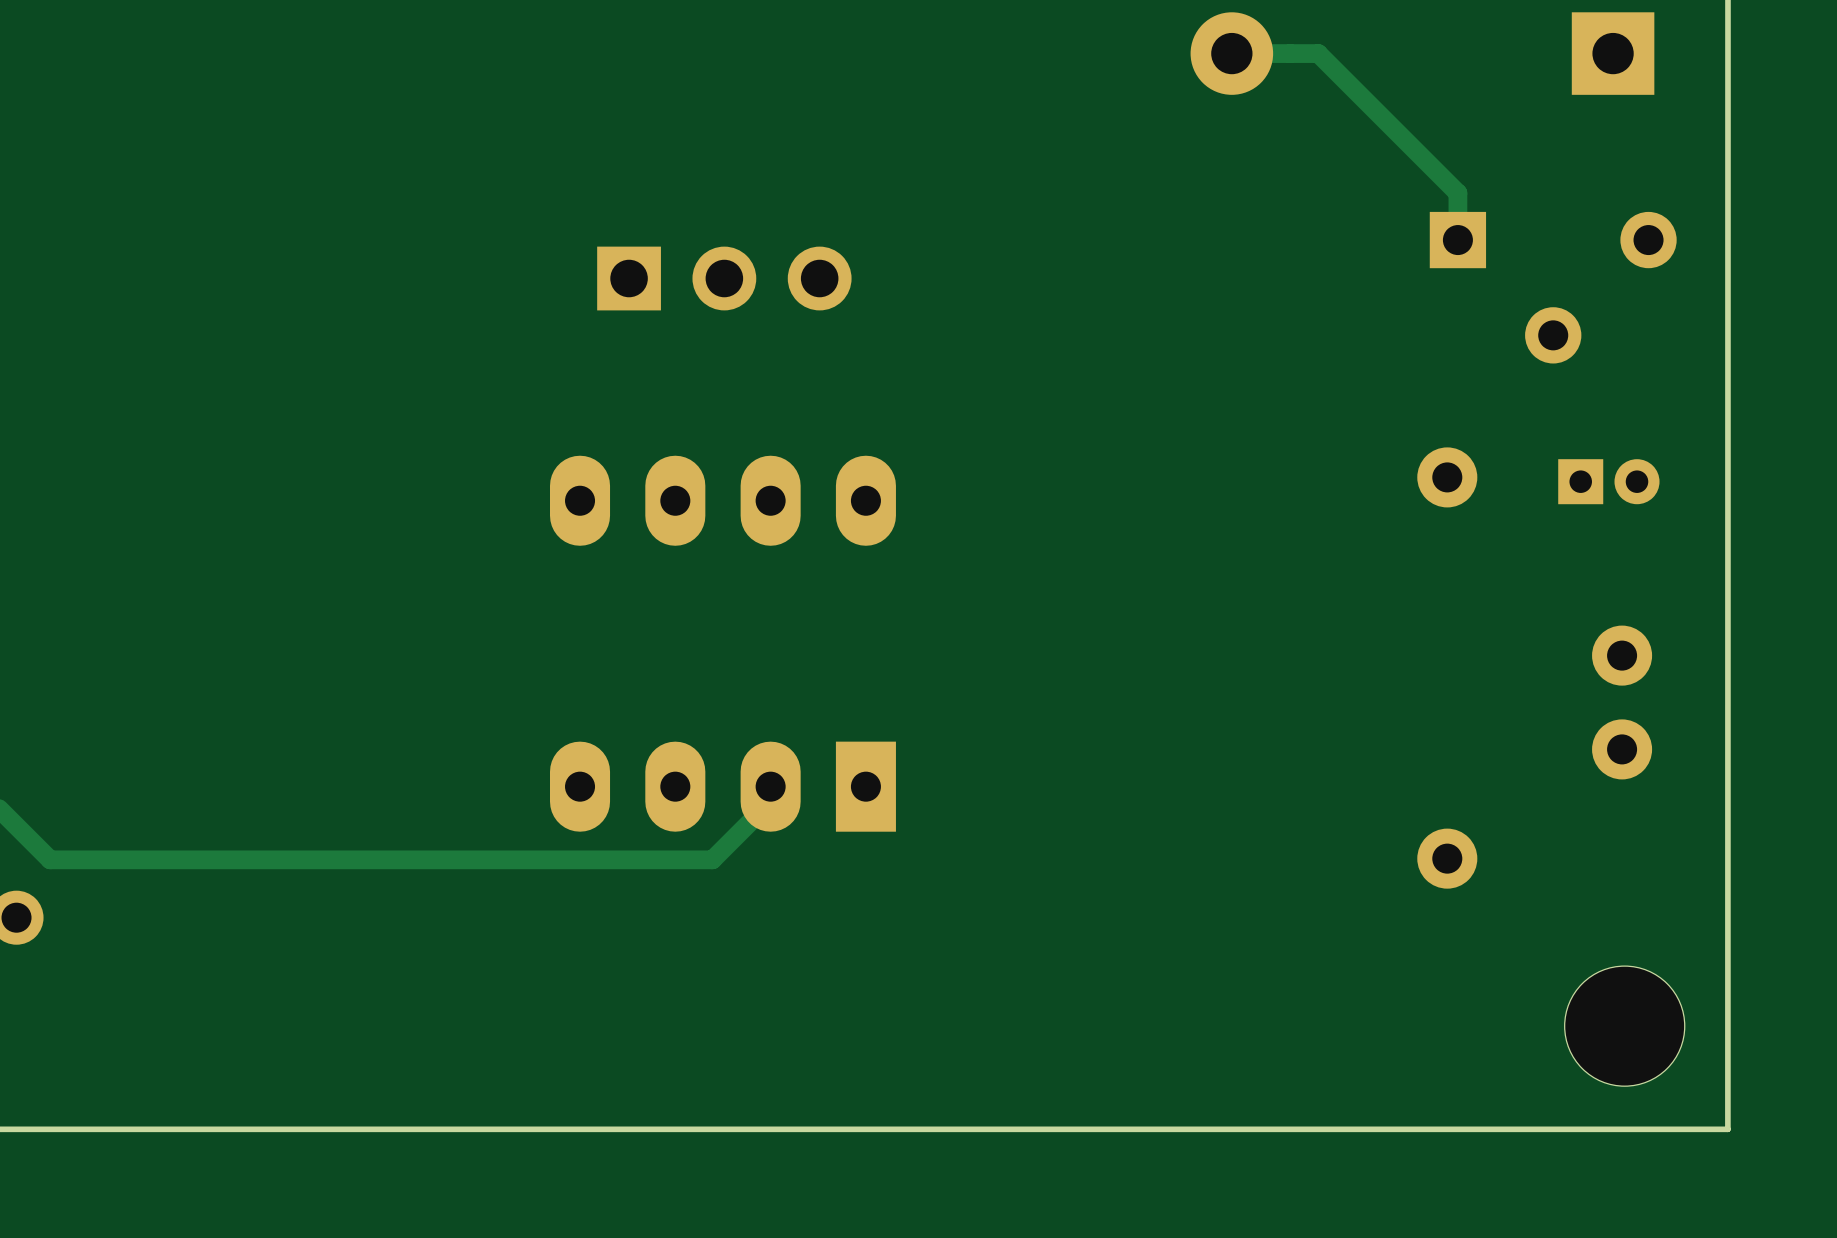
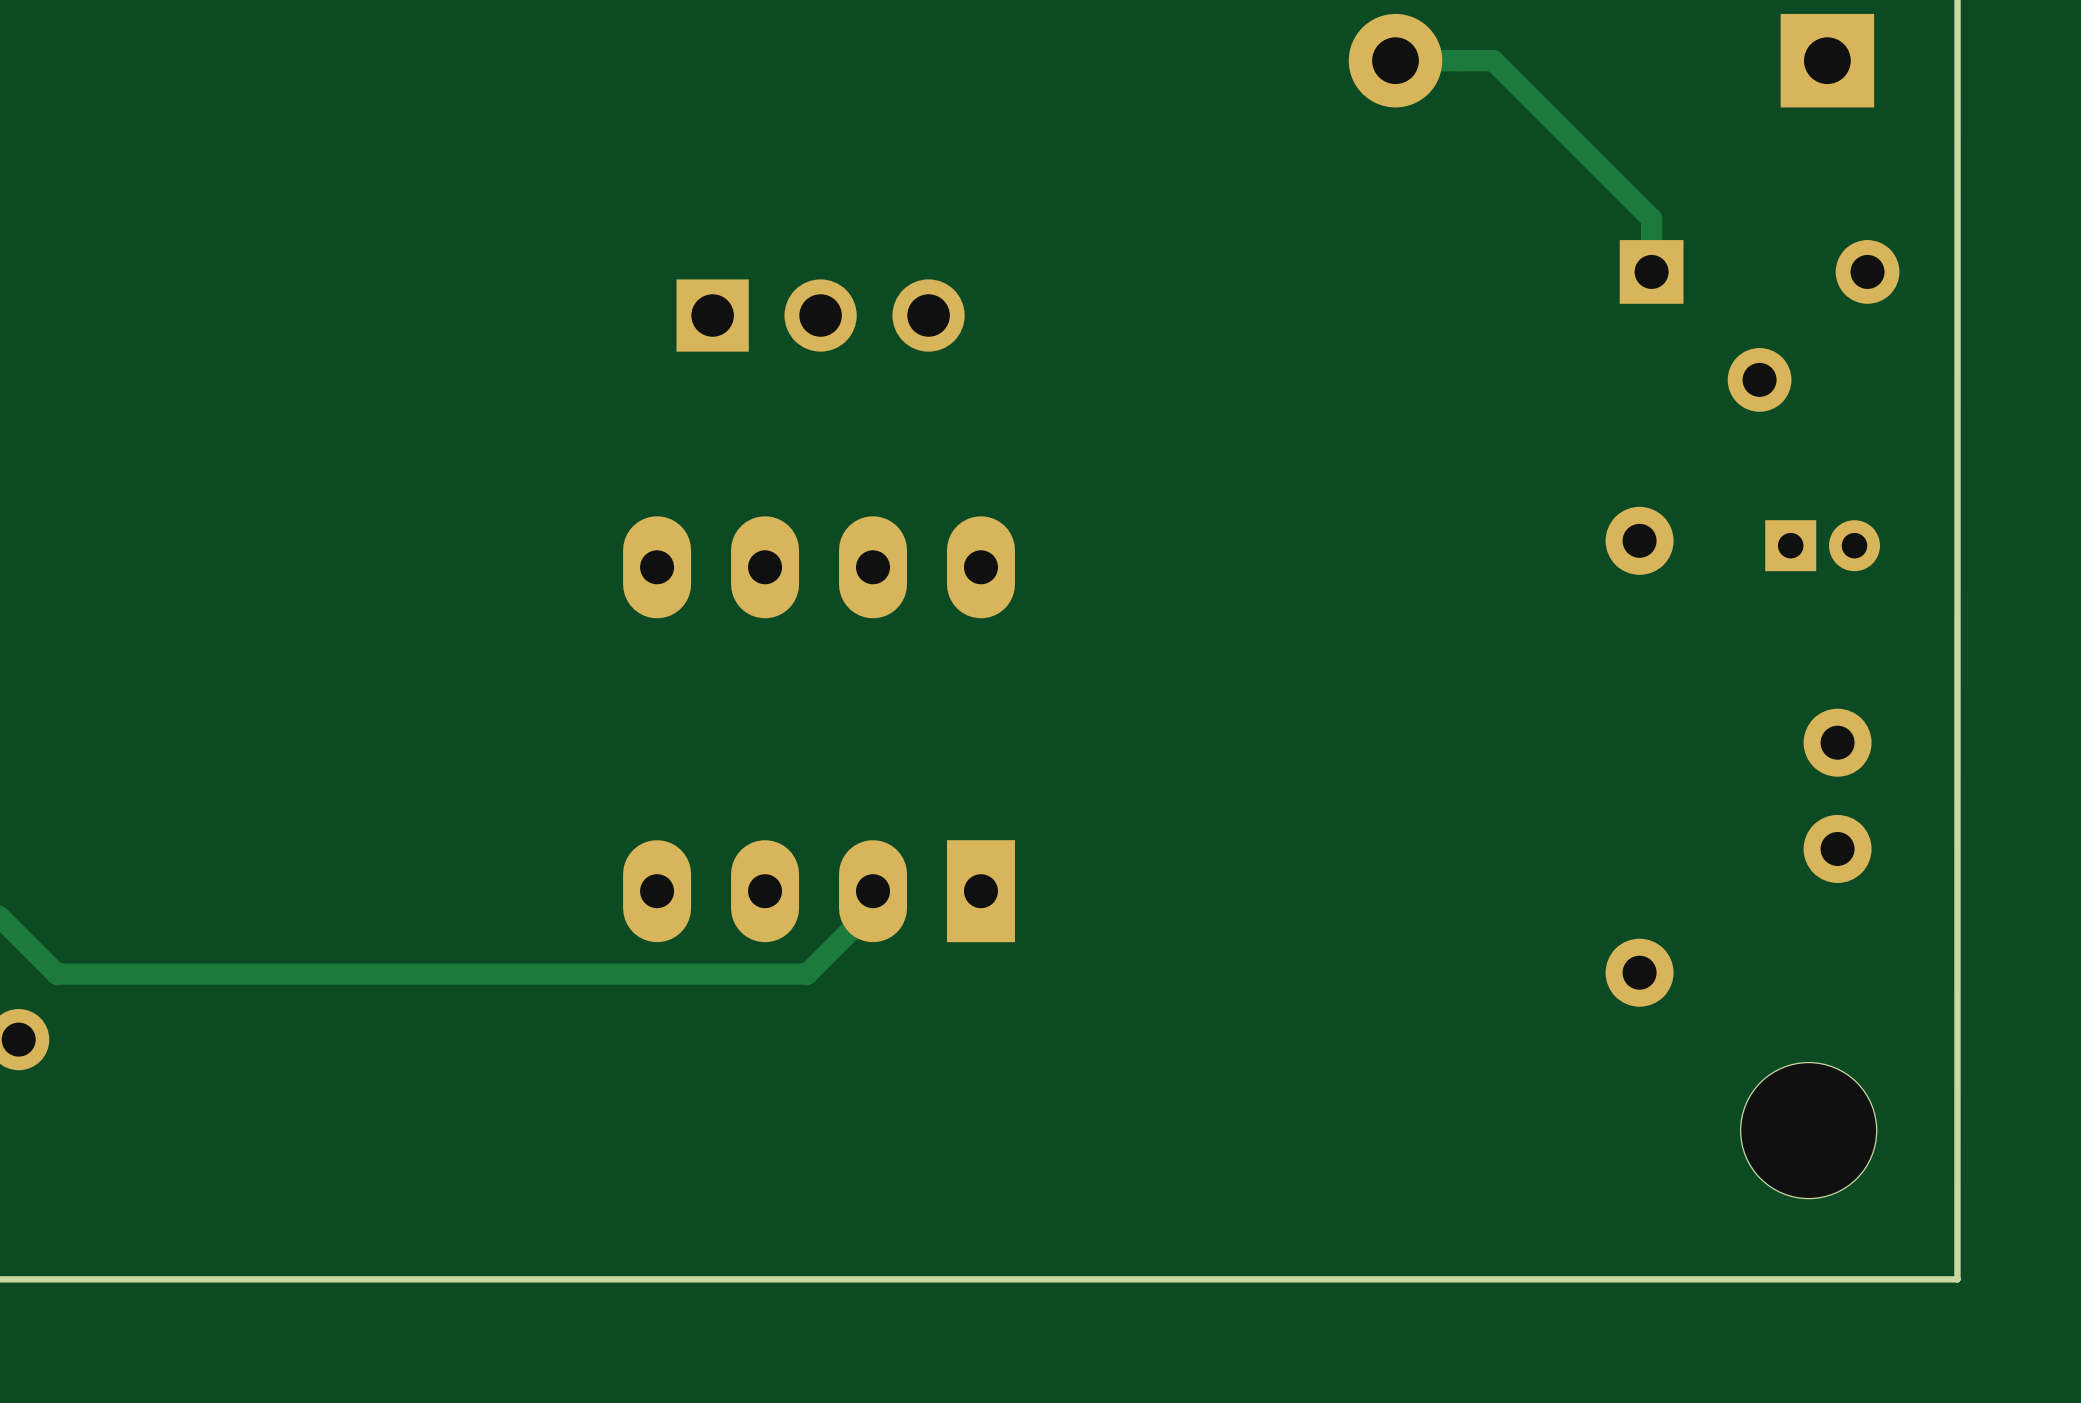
part position: (1624, 1026) -> (1808, 1130)

